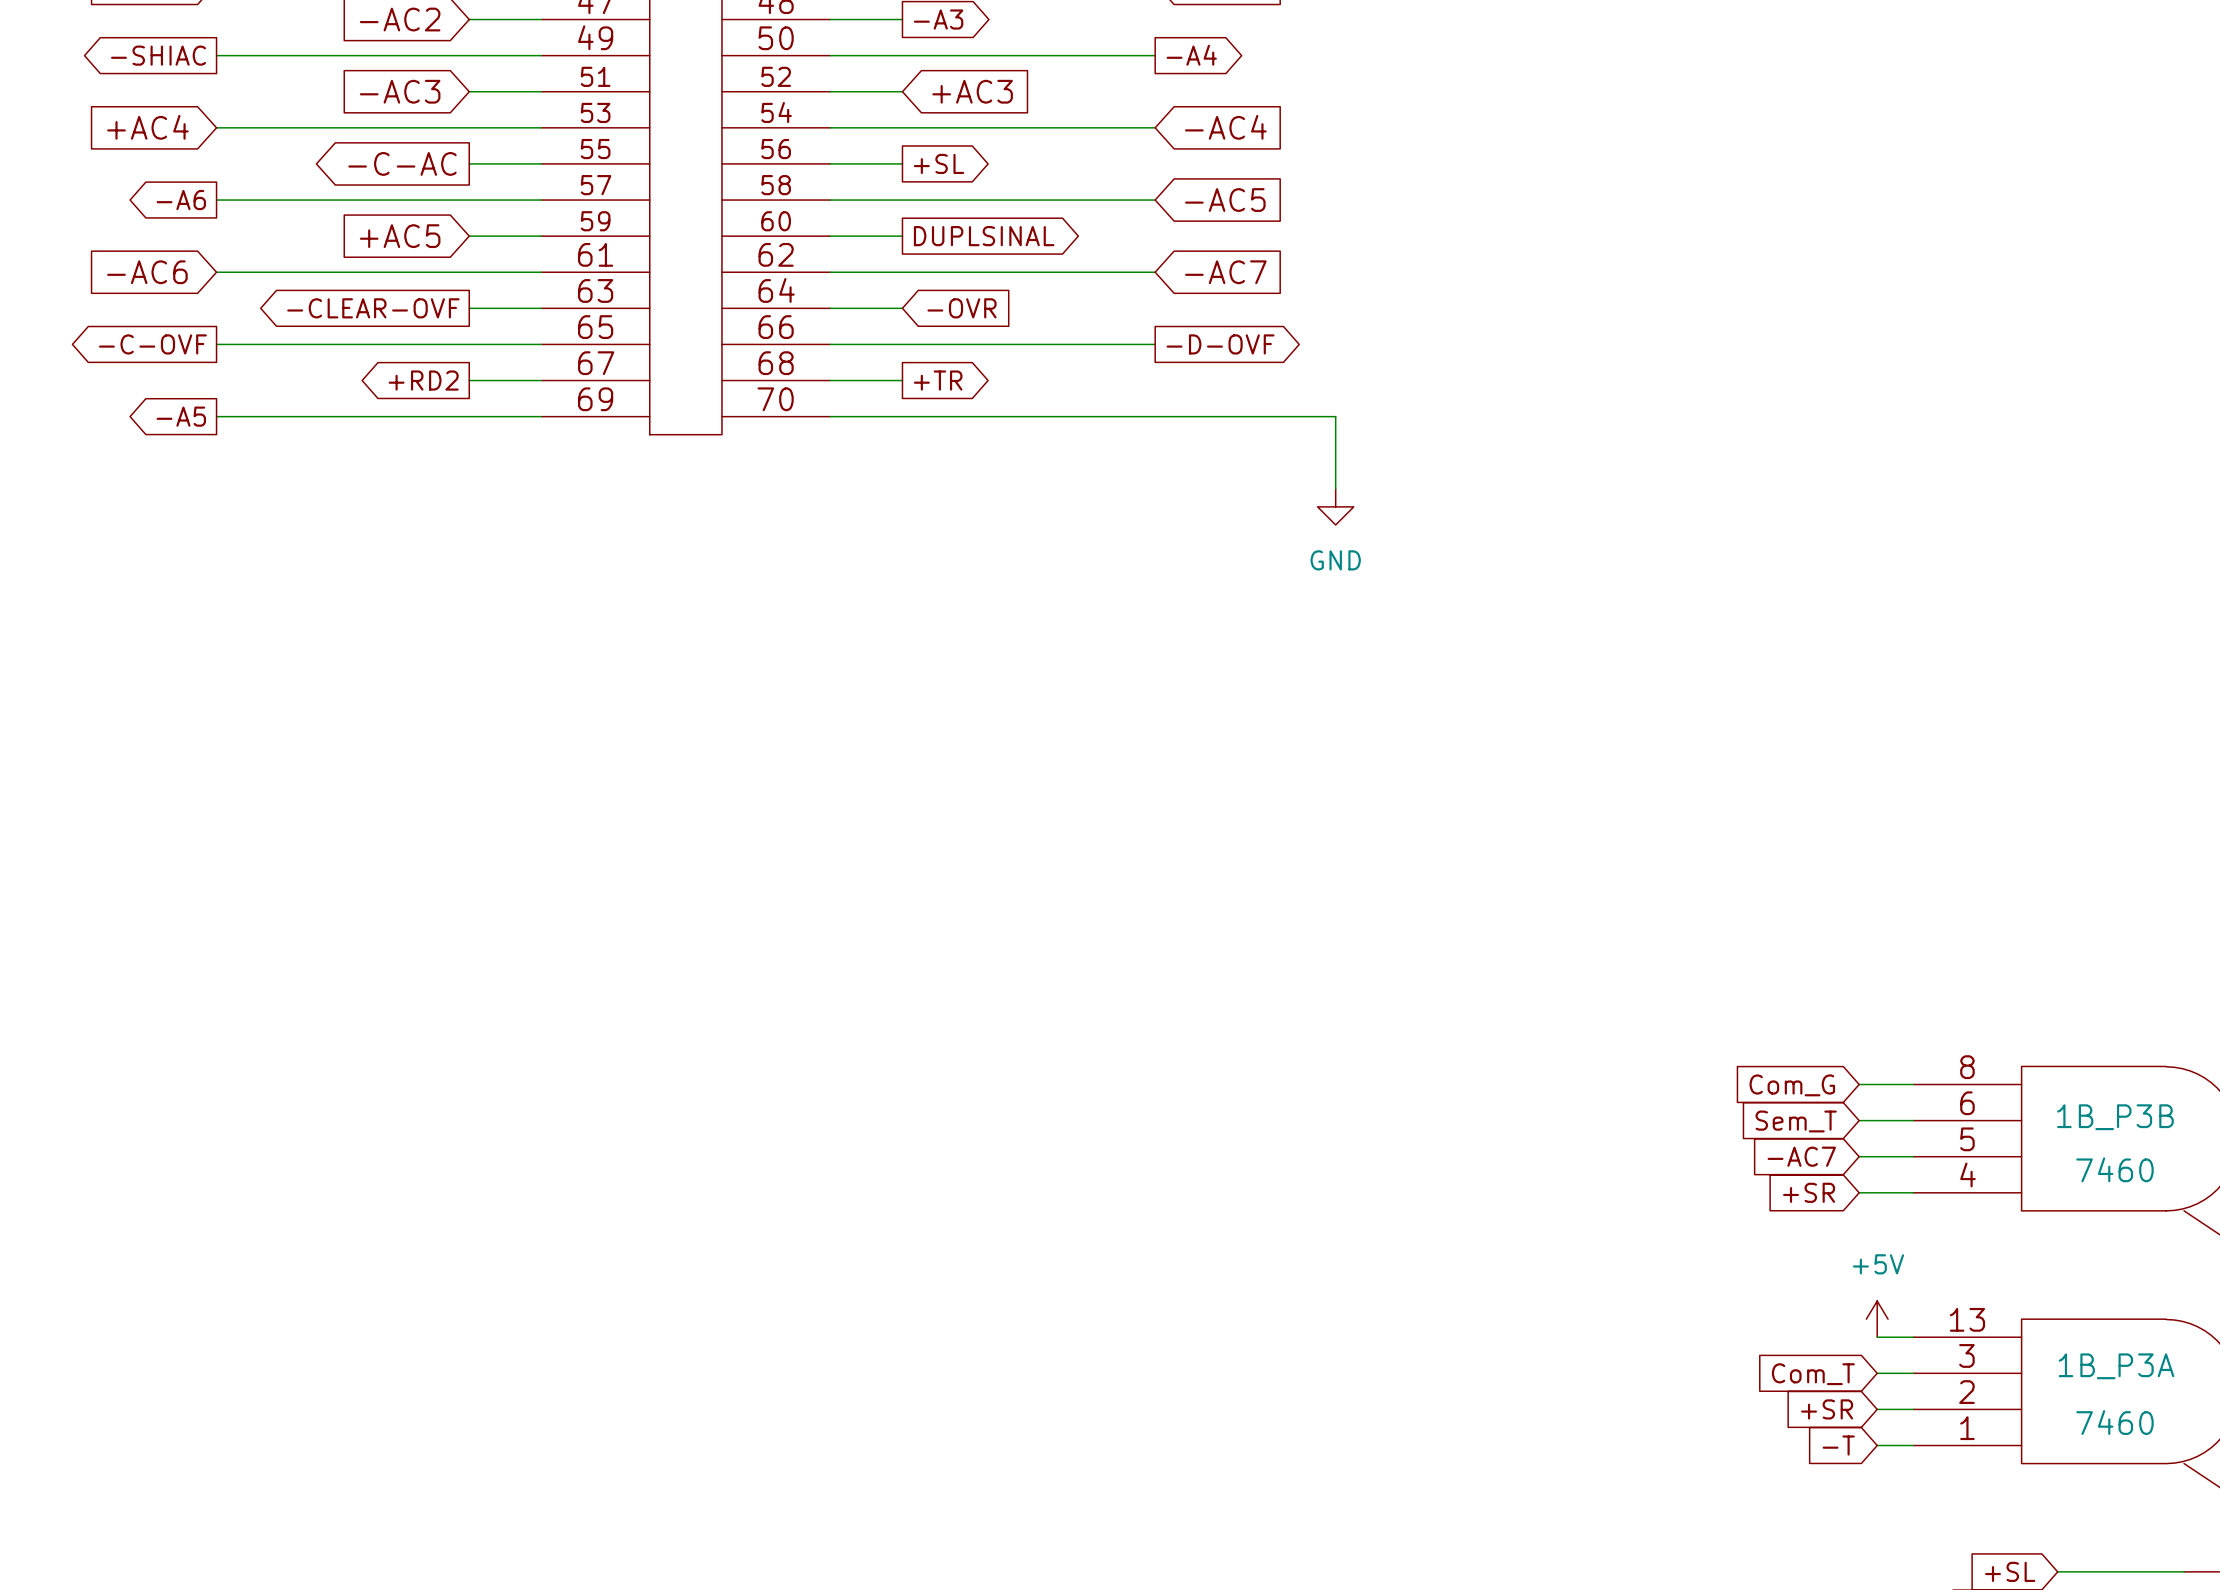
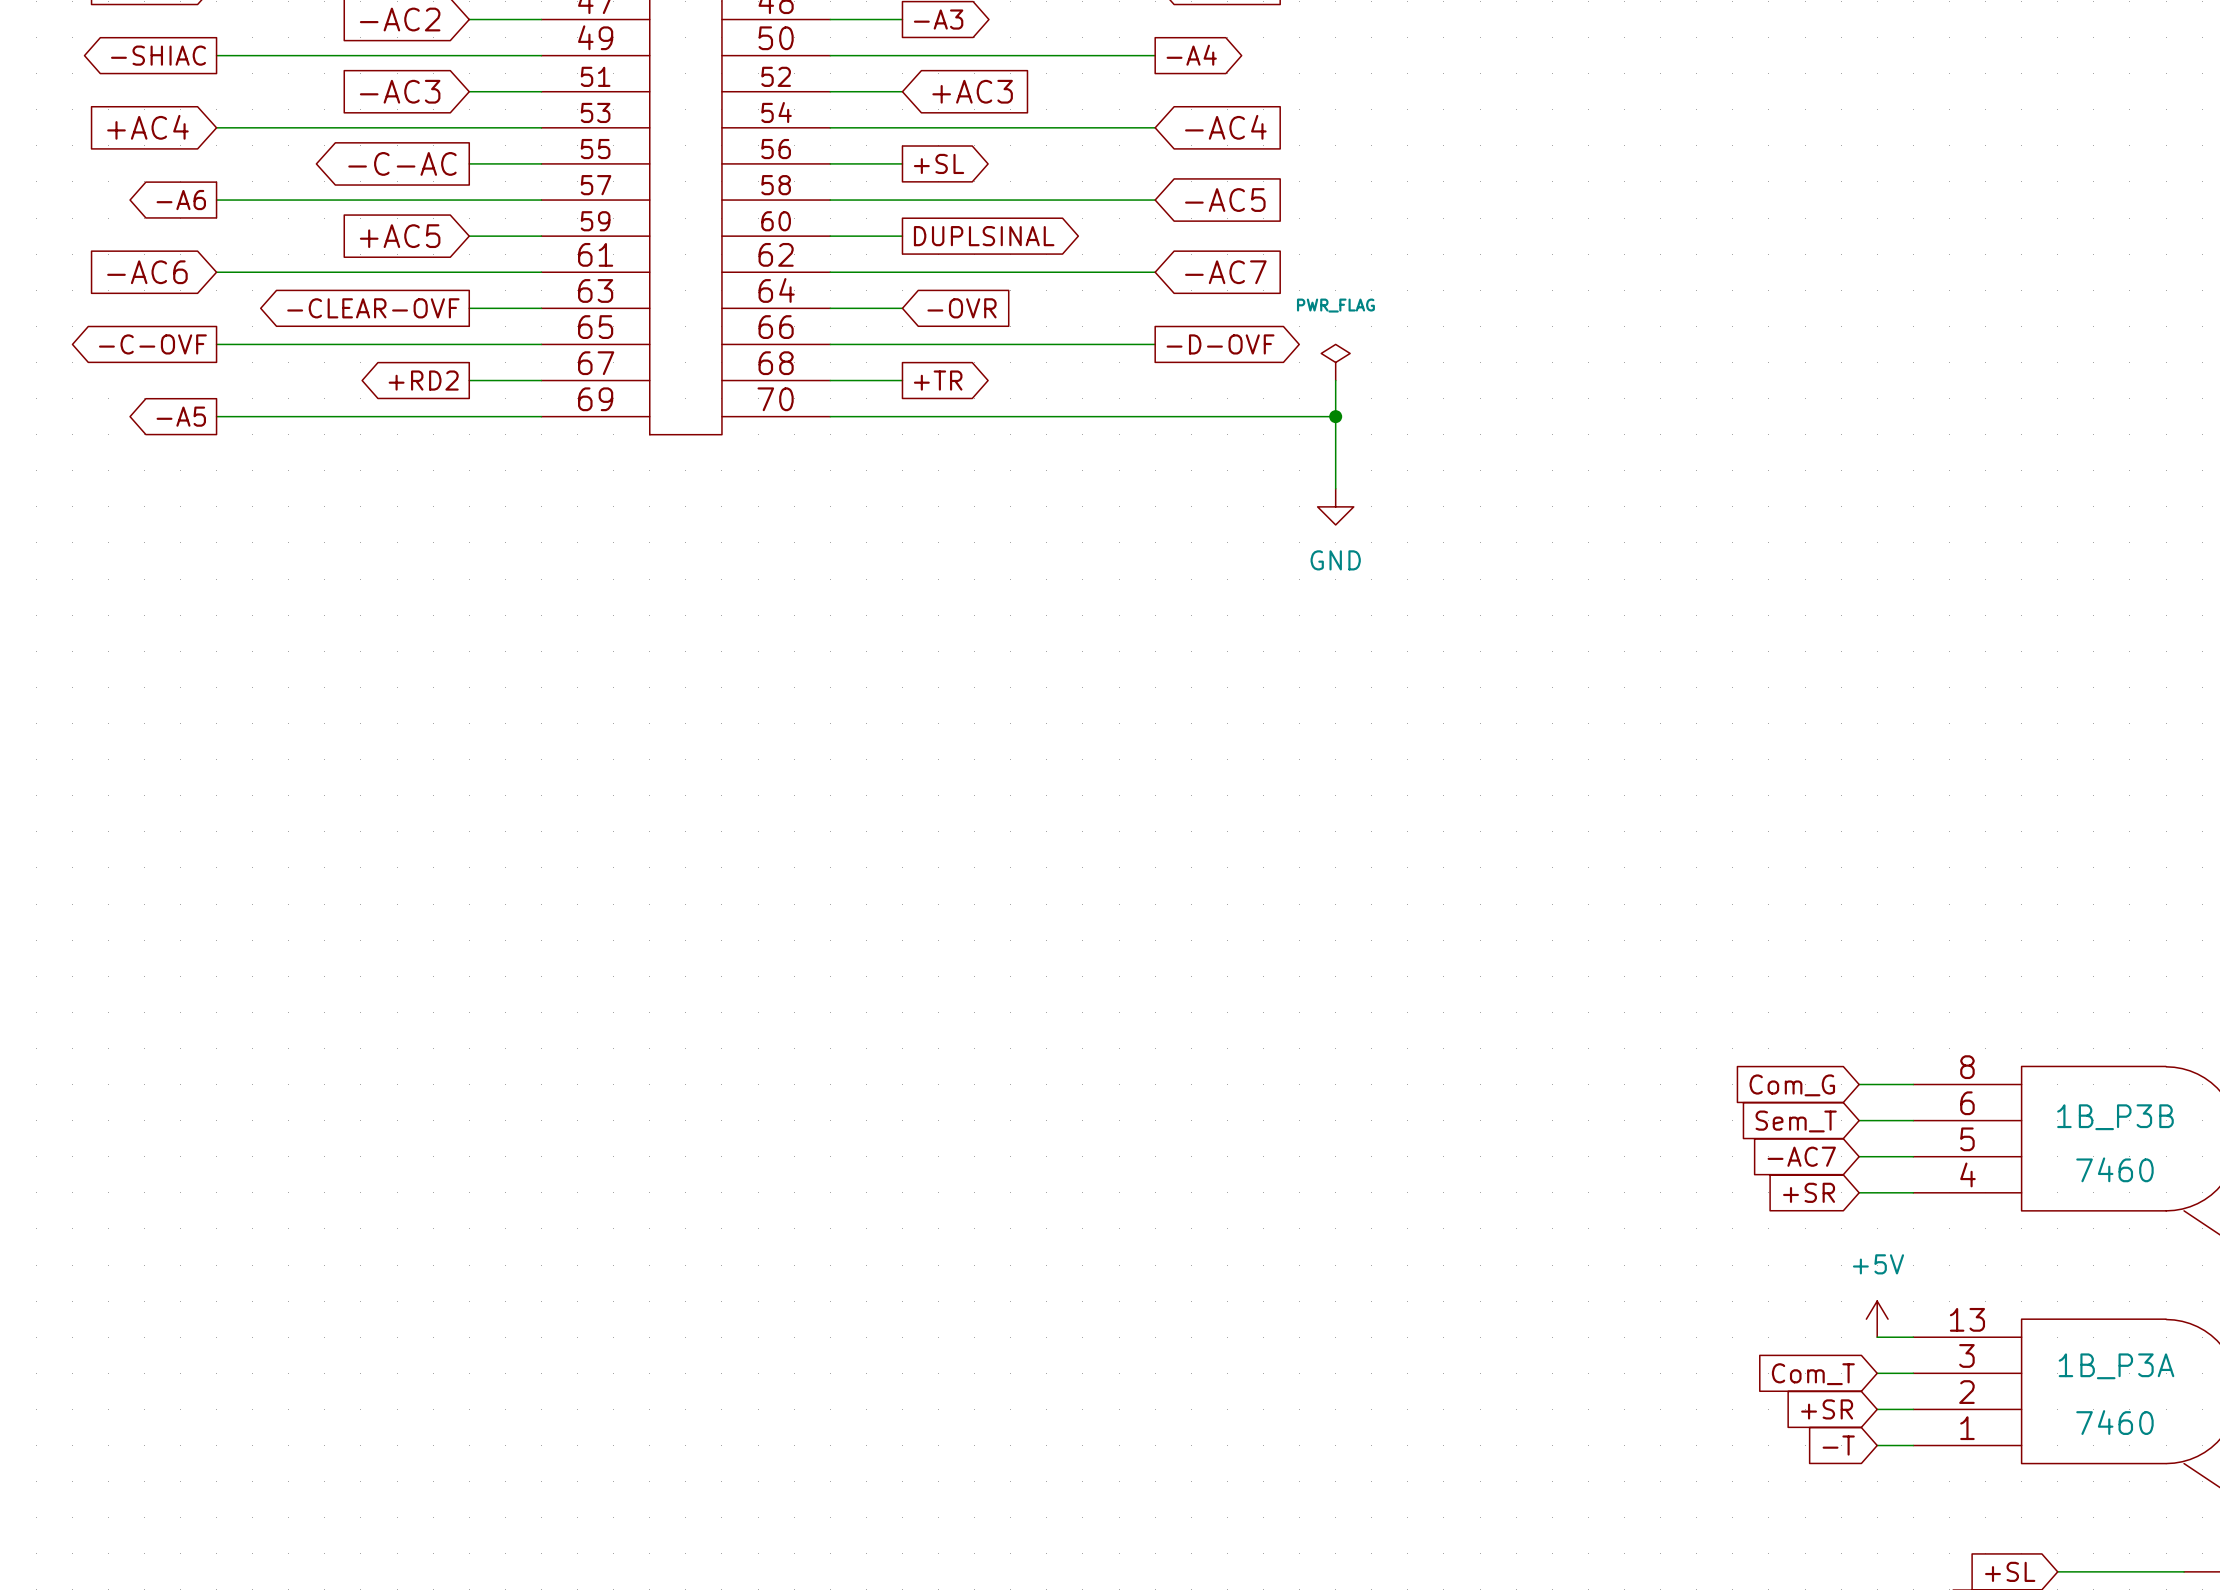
power symbol: none -> PWR_FLAG (1335, 362)
wire: none -> (1335, 380) (1335, 416)
junction: none -> (1335, 416)

